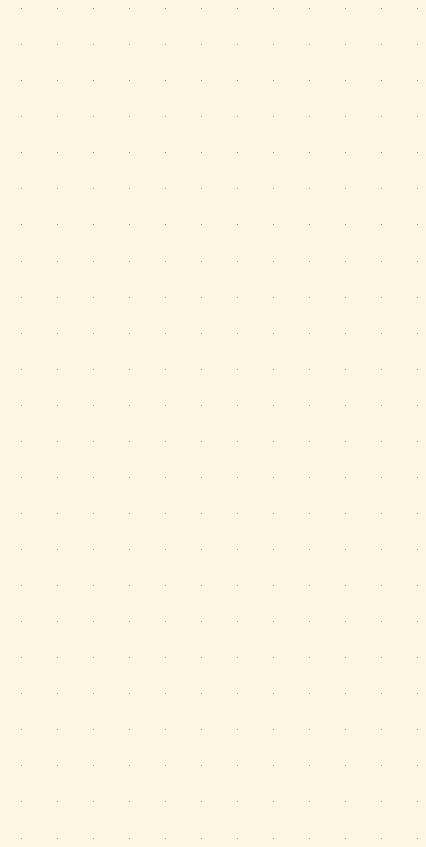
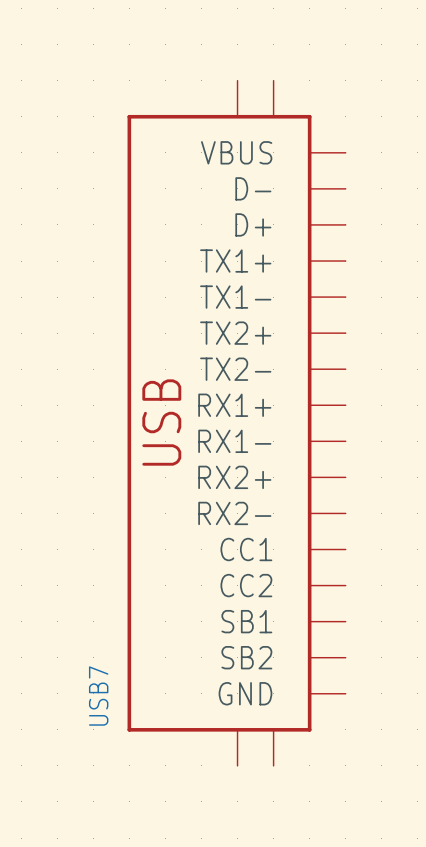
USB7: none -> (236, 423)

